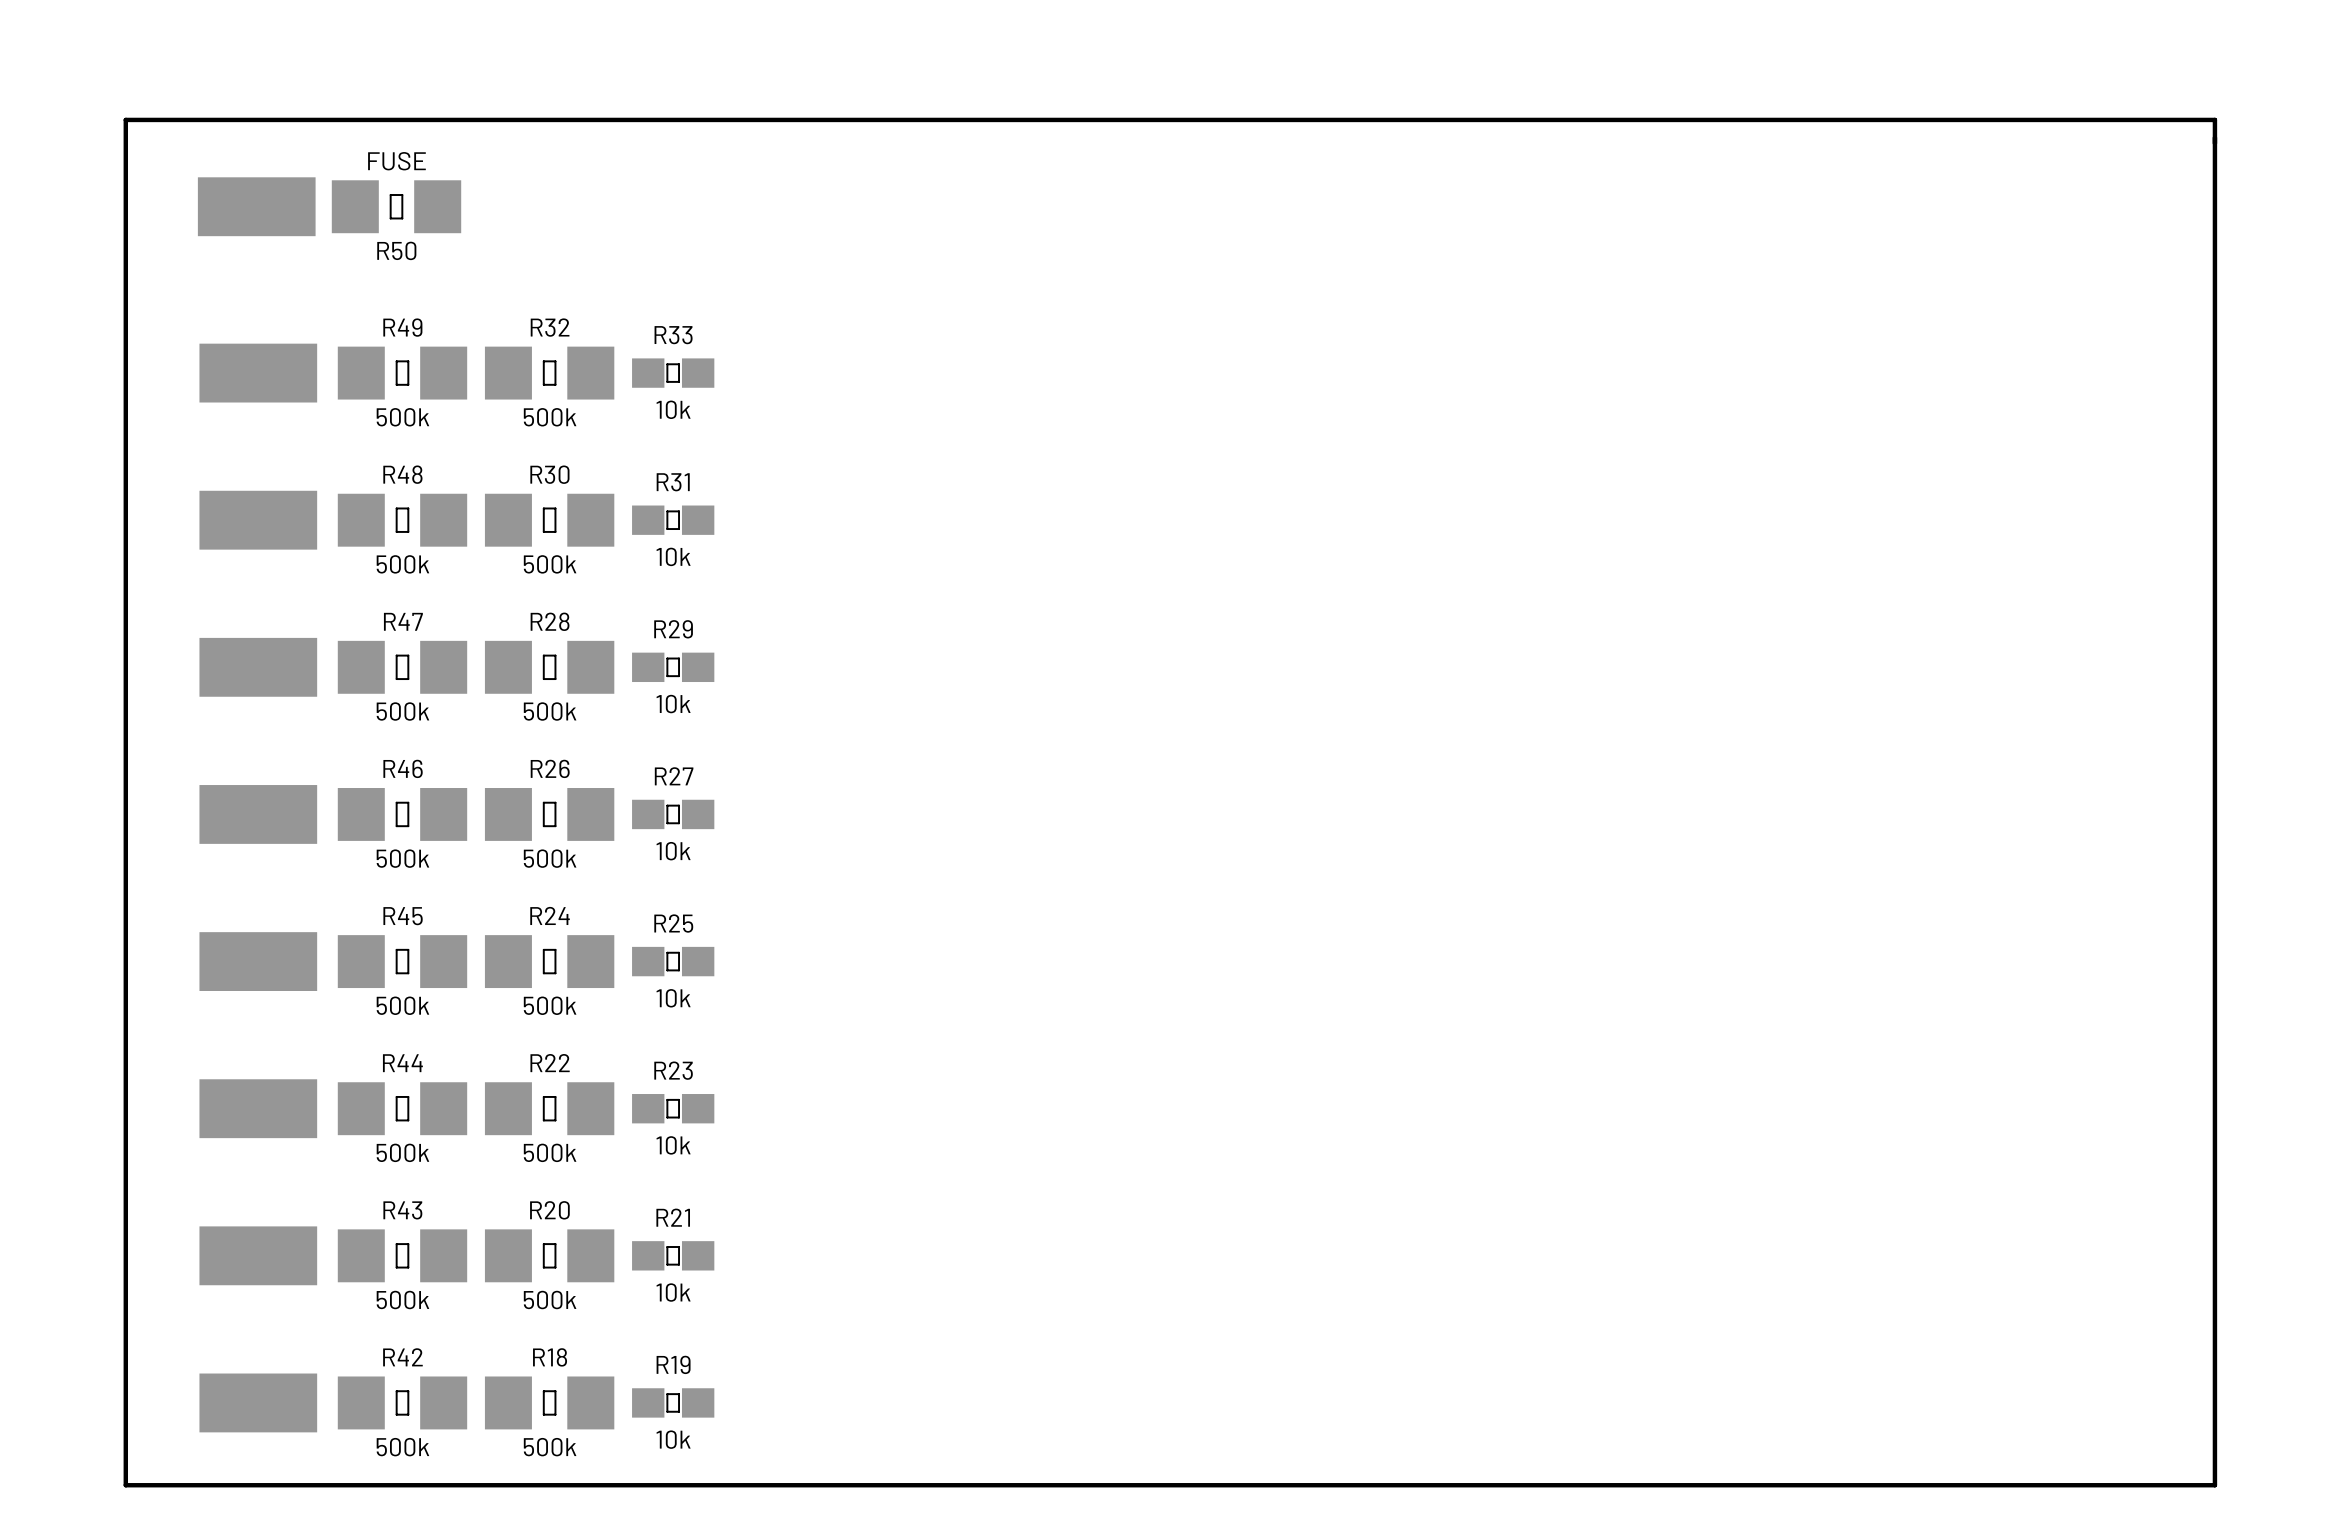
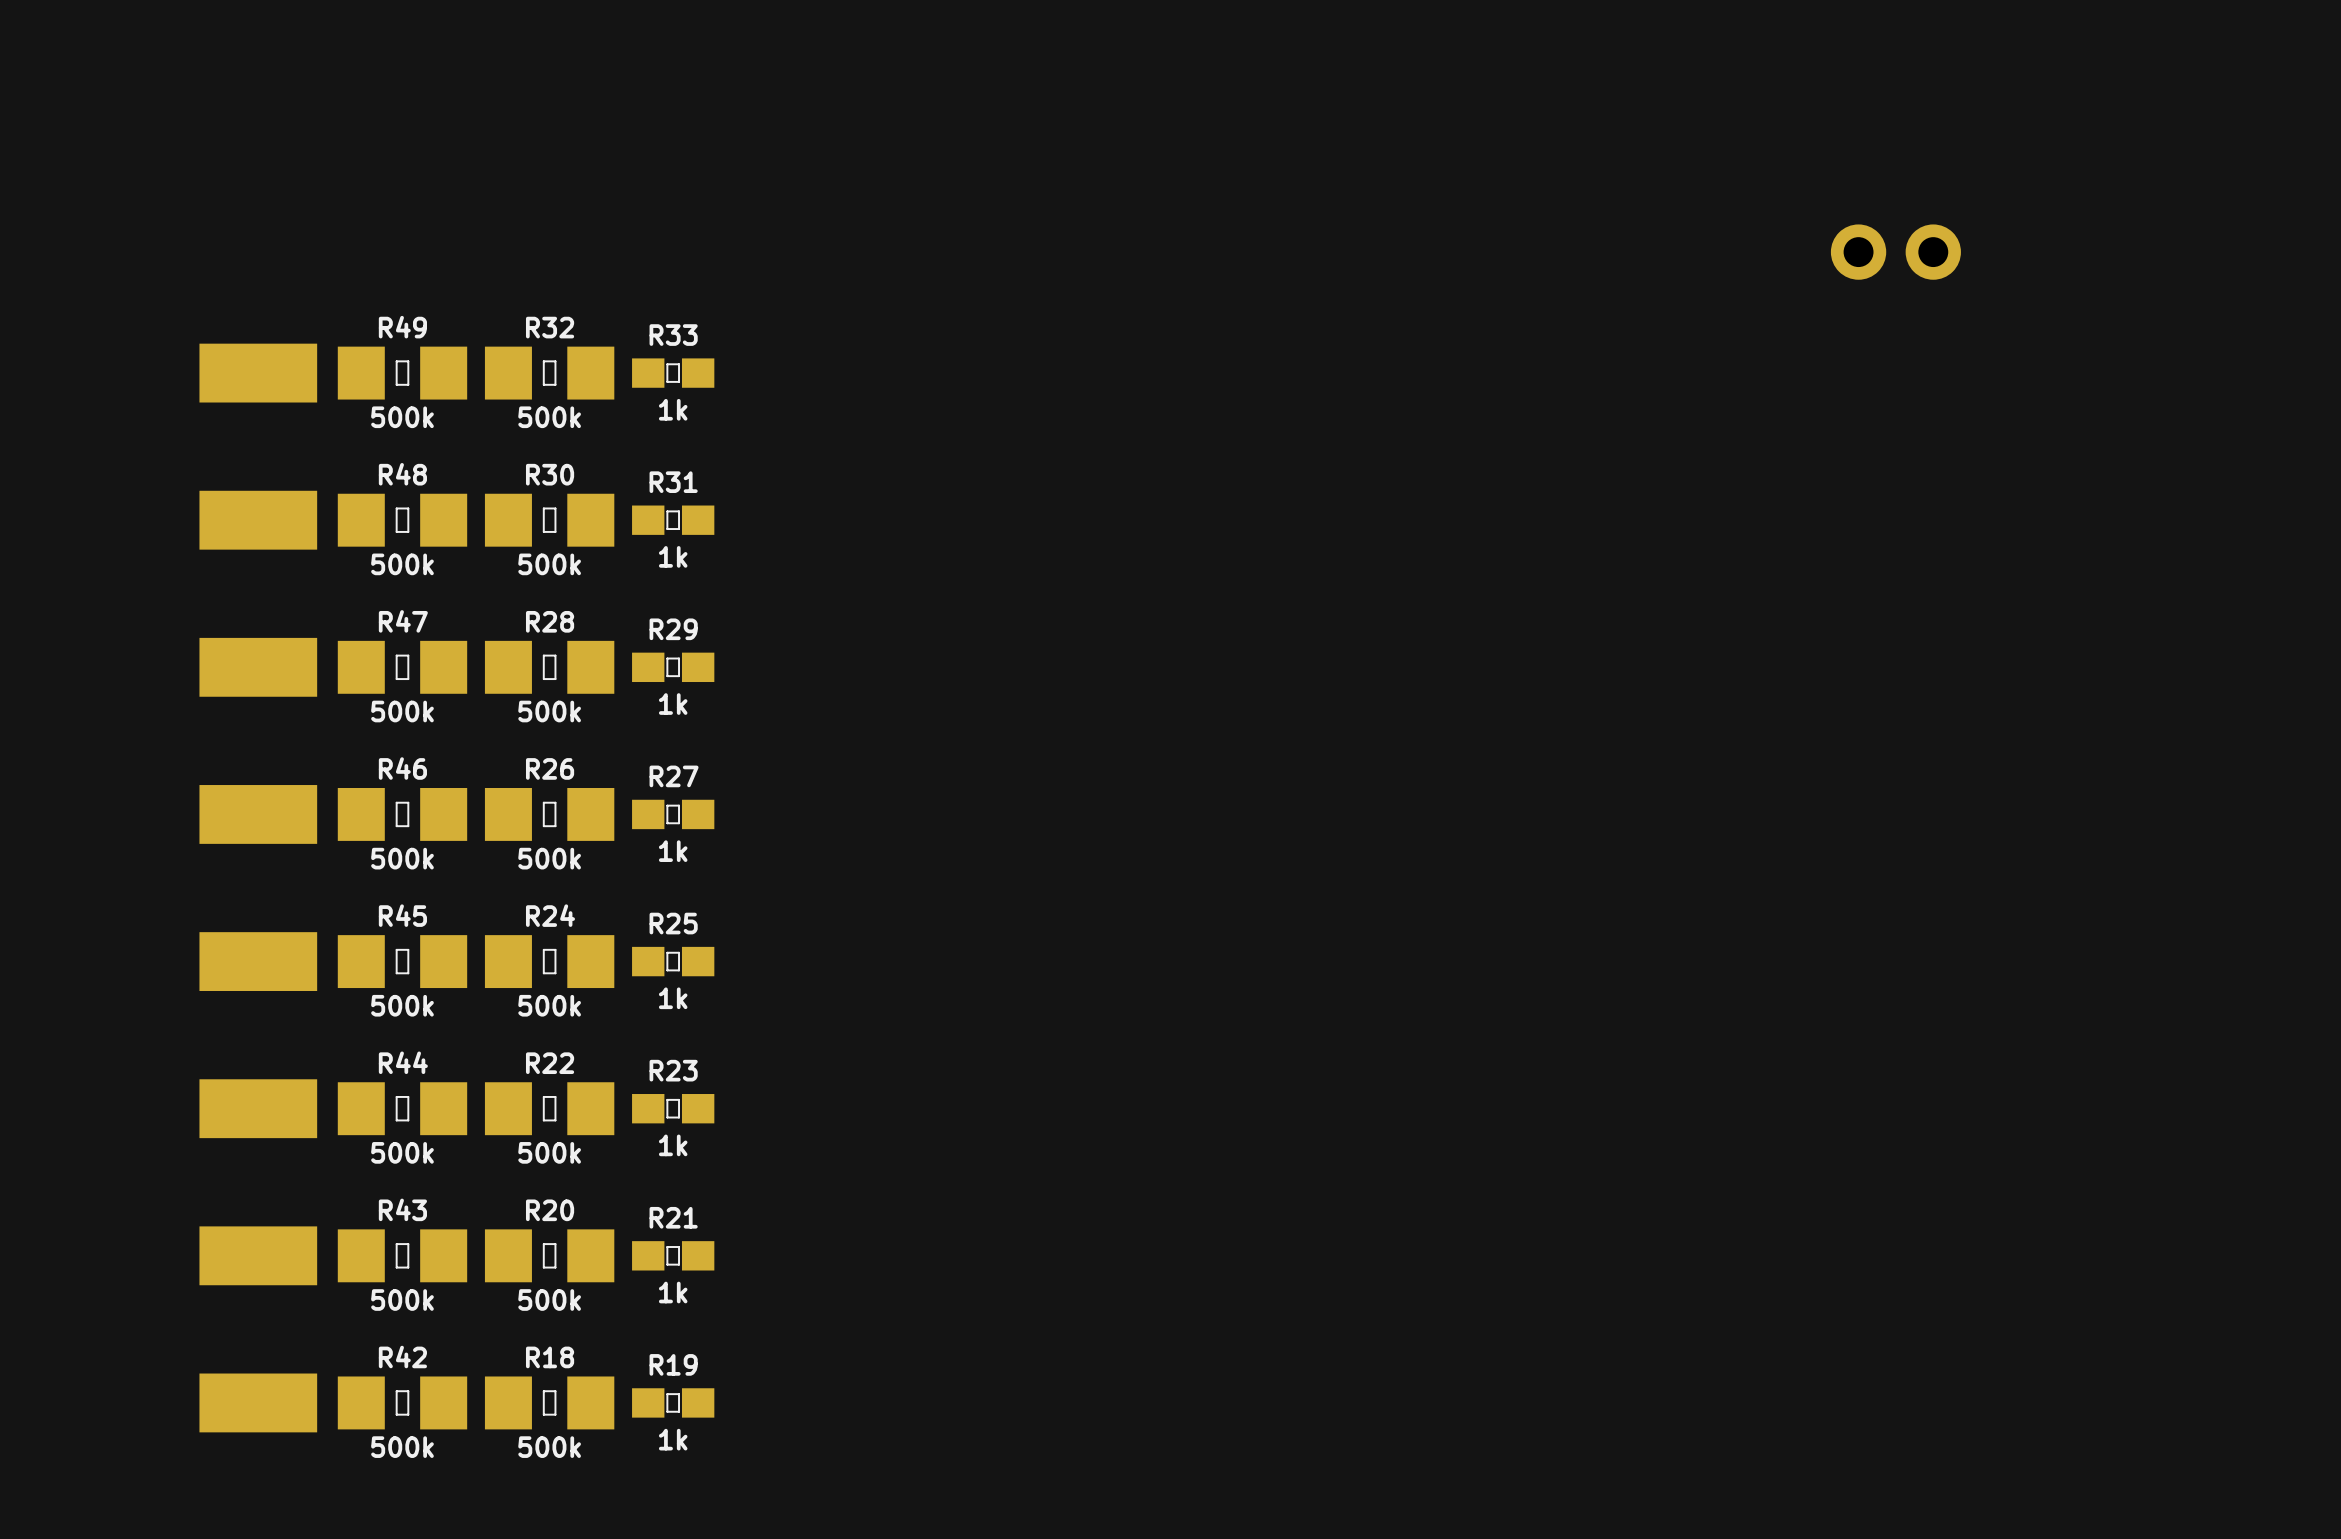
board edge: (2214, 119) (2214, 1485) (125, 1485) (125, 119) (2214, 119) -> none
part: (256, 206) -> none
R50: FUSE (396, 206) -> none
part: none -> (1895, 252)
R33 value: 10k (673, 409) -> 1k (673, 409)
R31 value: 10k (673, 556) -> 1k (673, 556)
R29 value: 10k (673, 704) -> 1k (673, 704)
R27 value: 10k (673, 851) -> 1k (673, 851)
R25 value: 10k (673, 998) -> 1k (673, 998)
R23 value: 10k (673, 1145) -> 1k (673, 1145)
R21 value: 10k (673, 1292) -> 1k (673, 1292)
R19 value: 10k (673, 1439) -> 1k (673, 1439)

